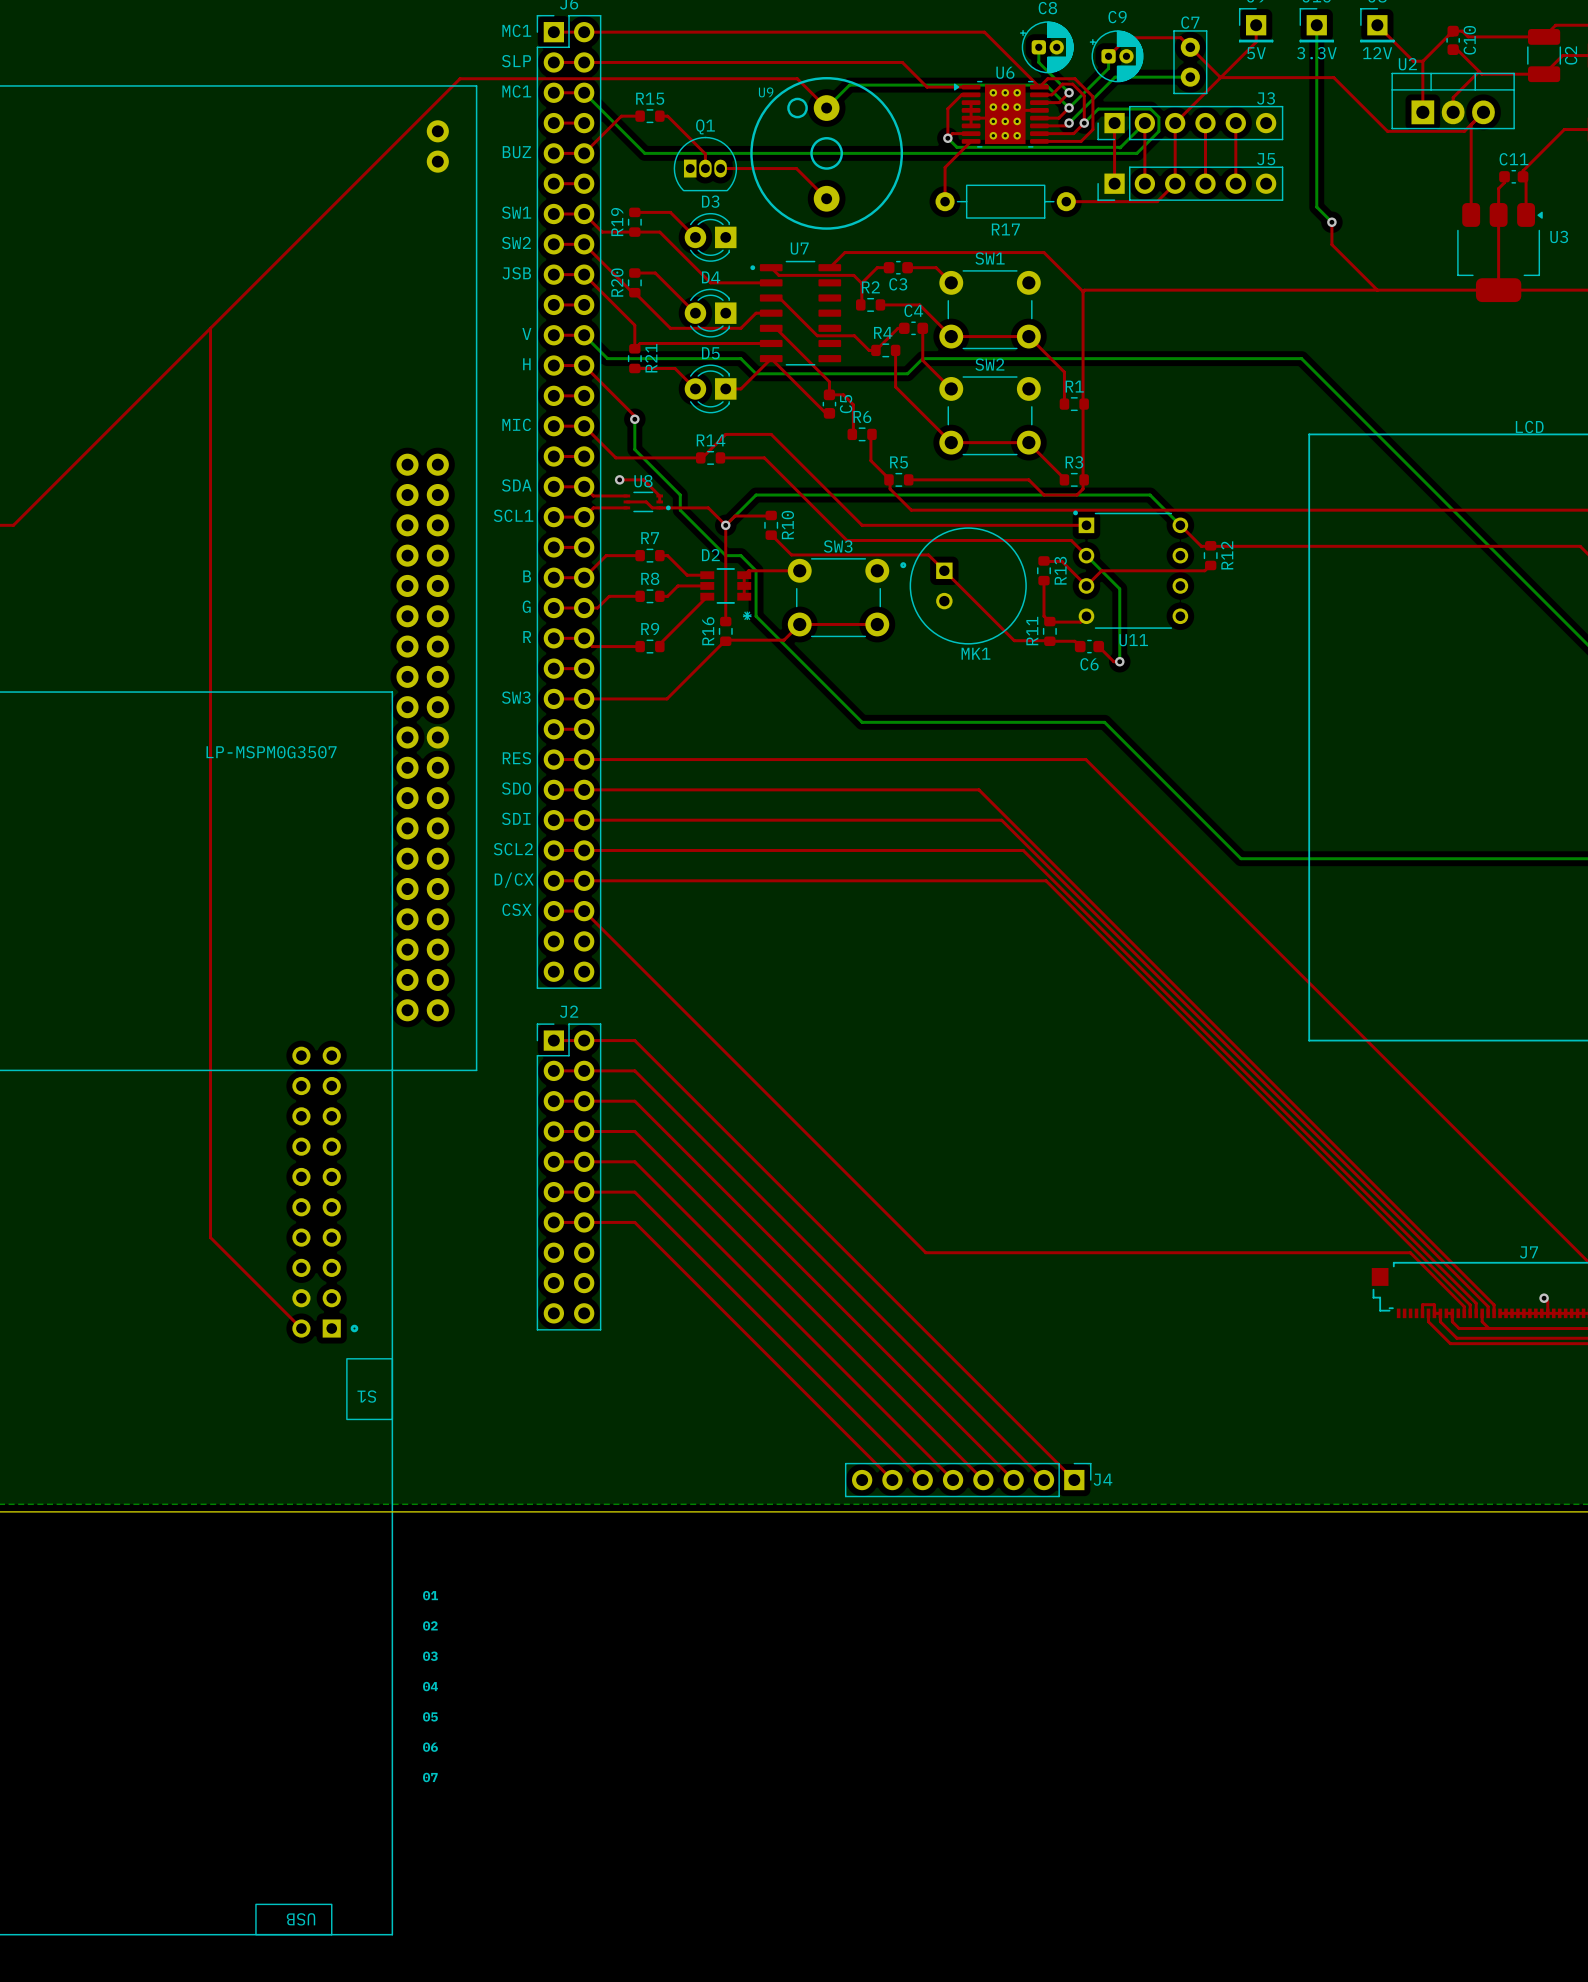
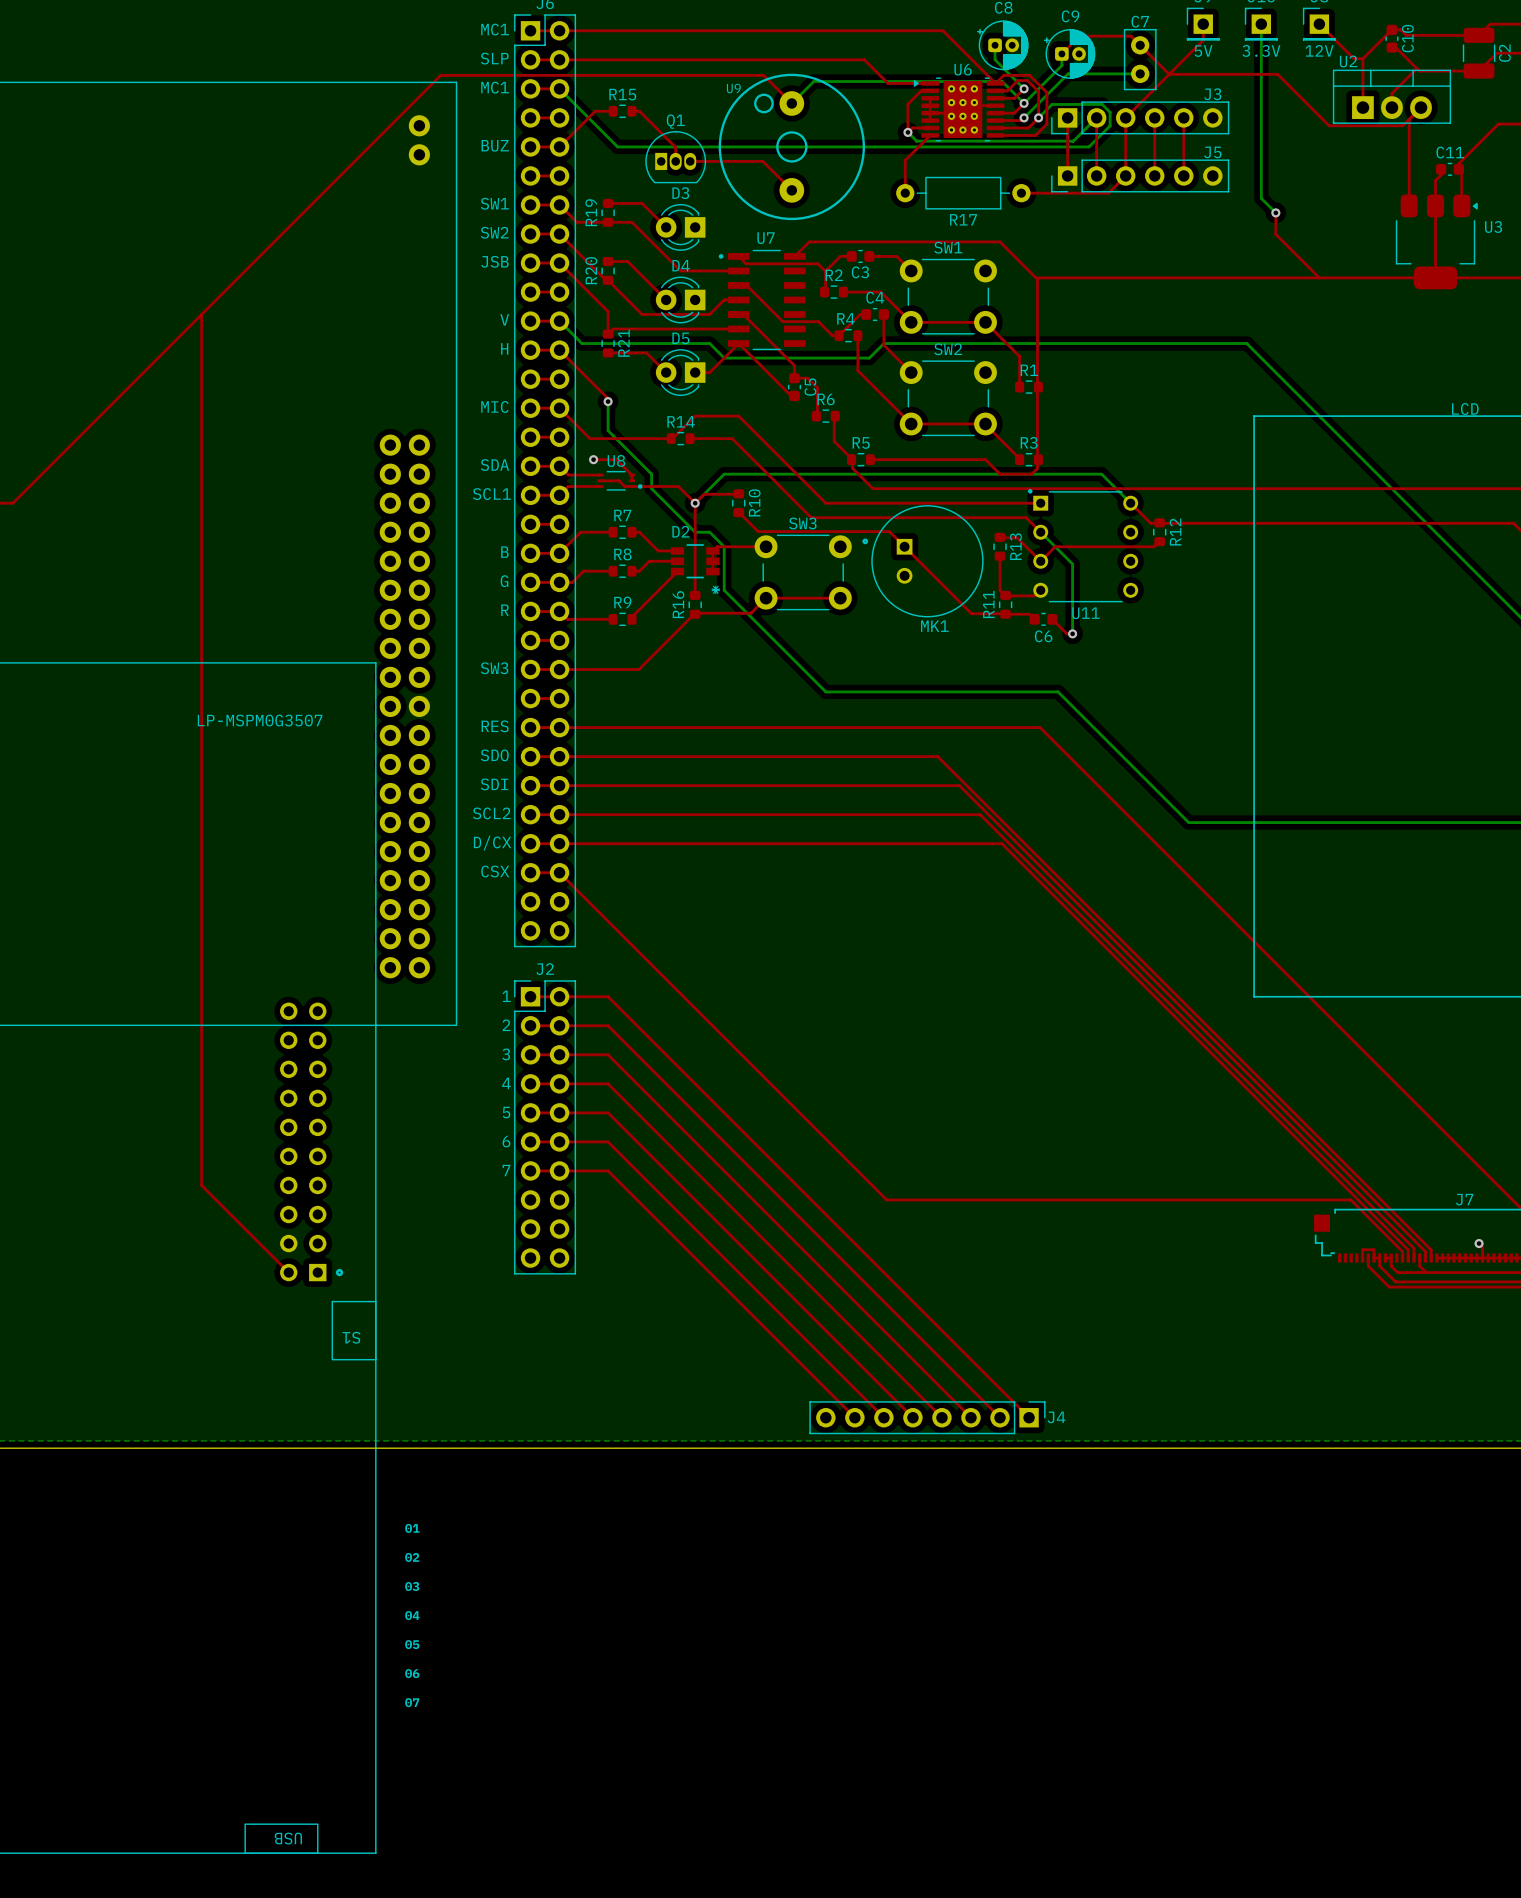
text: none -> 1 (506, 996)
text: none -> 2 (506, 1025)
text: none -> 3 (506, 1054)
text: none -> 4 (506, 1083)
text: none -> 5 (506, 1112)
text: none -> 6 (506, 1141)
text: none -> 7 (506, 1170)

